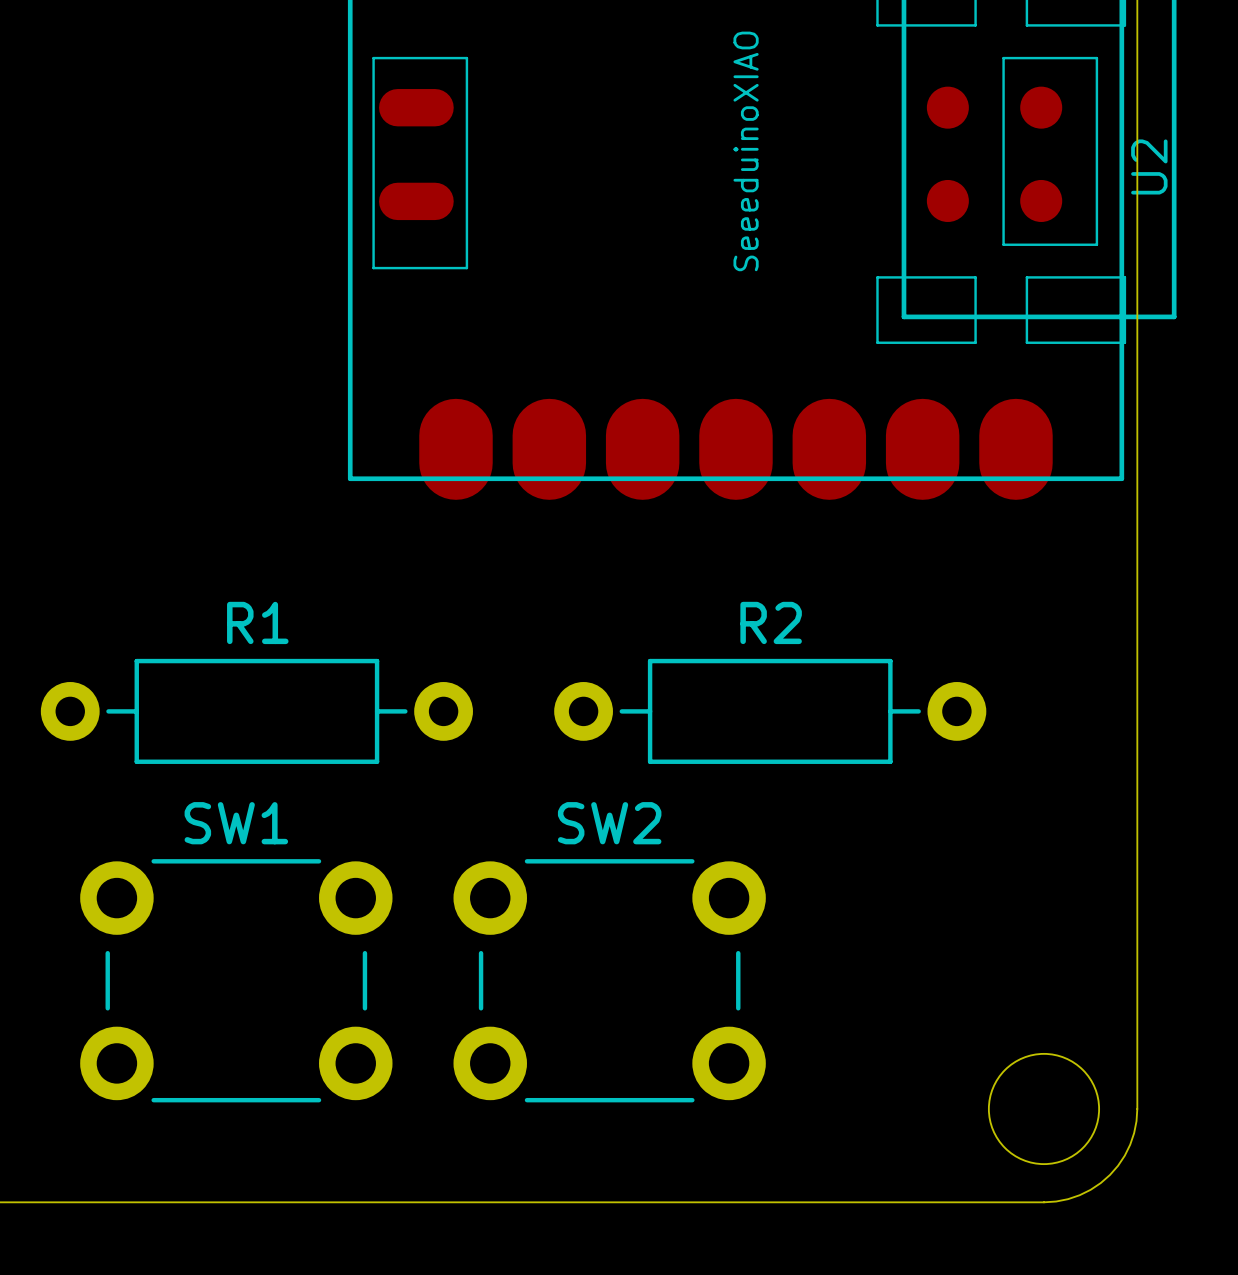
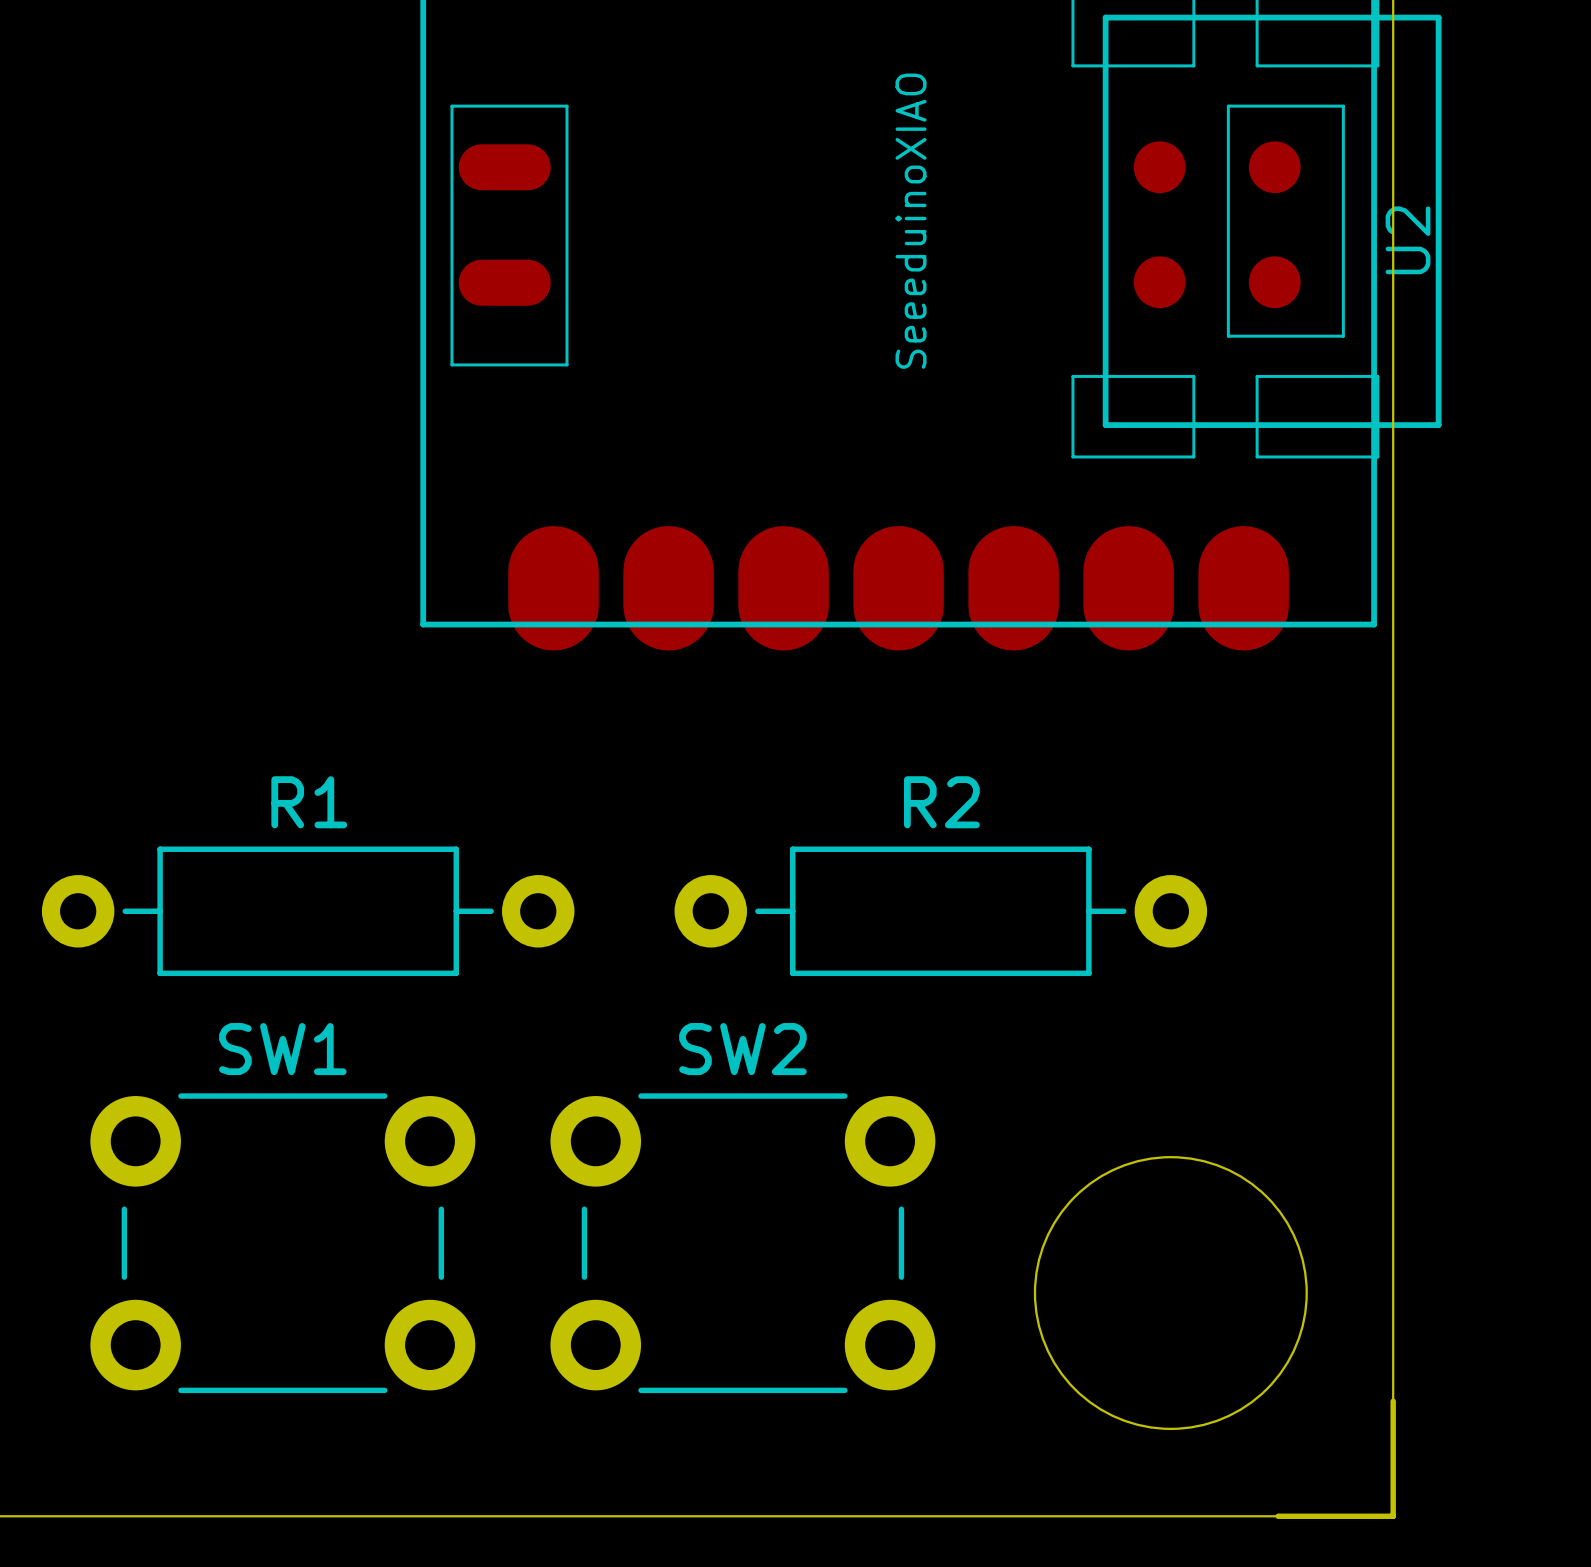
round board edge: none -> [1033, 1156, 1308, 1431]
round board edge: [987, 1052, 1101, 1166] -> none
board edge: (1137, 1108) (1134, 1133) (1130, 1144) (1124, 1155) (1109, 1174) (1090, 1189) (1079, 1195) (1056, 1201) (1043, 1202) -> (1393, 1401) (1393, 1516) (1278, 1516)

